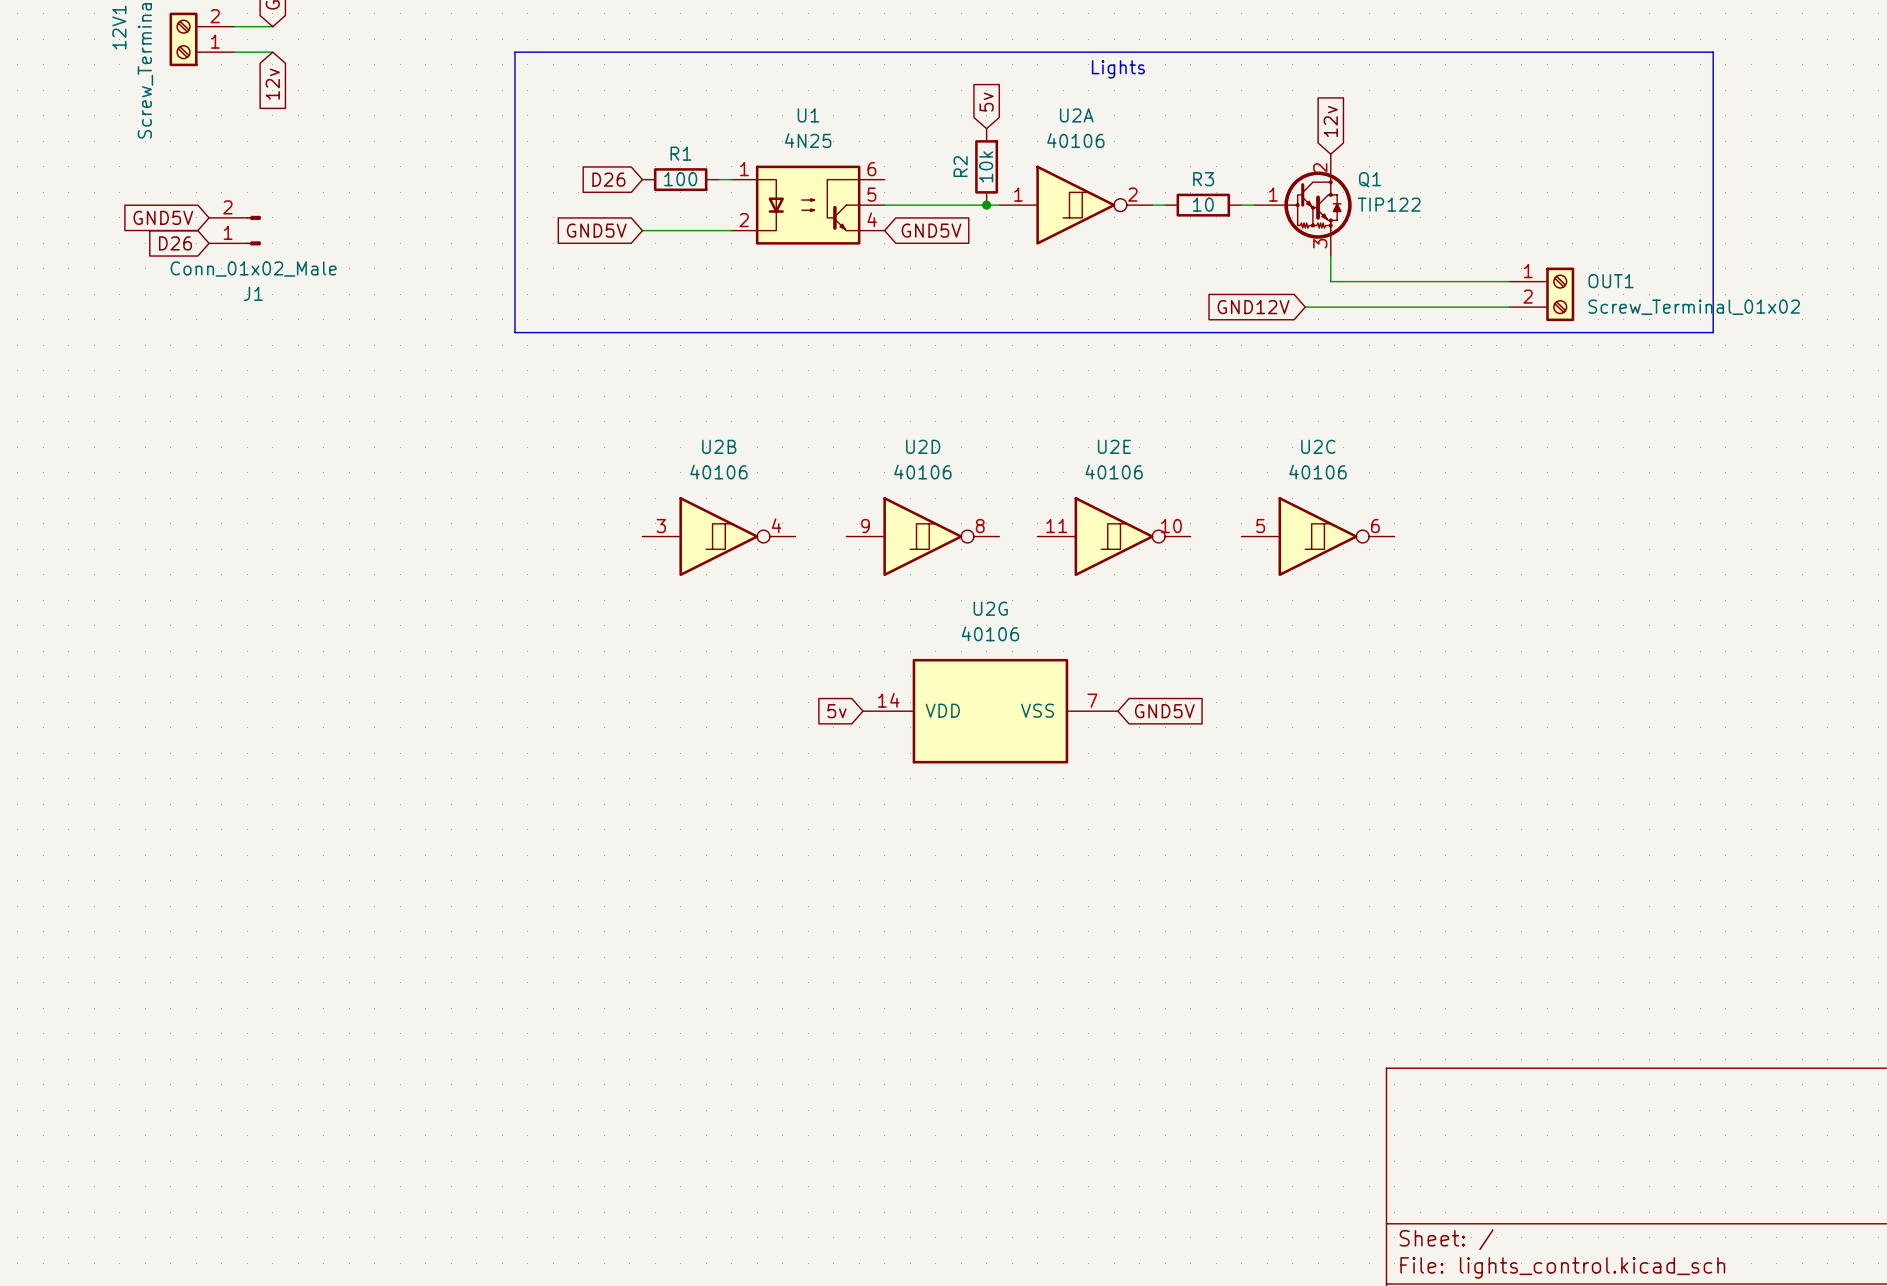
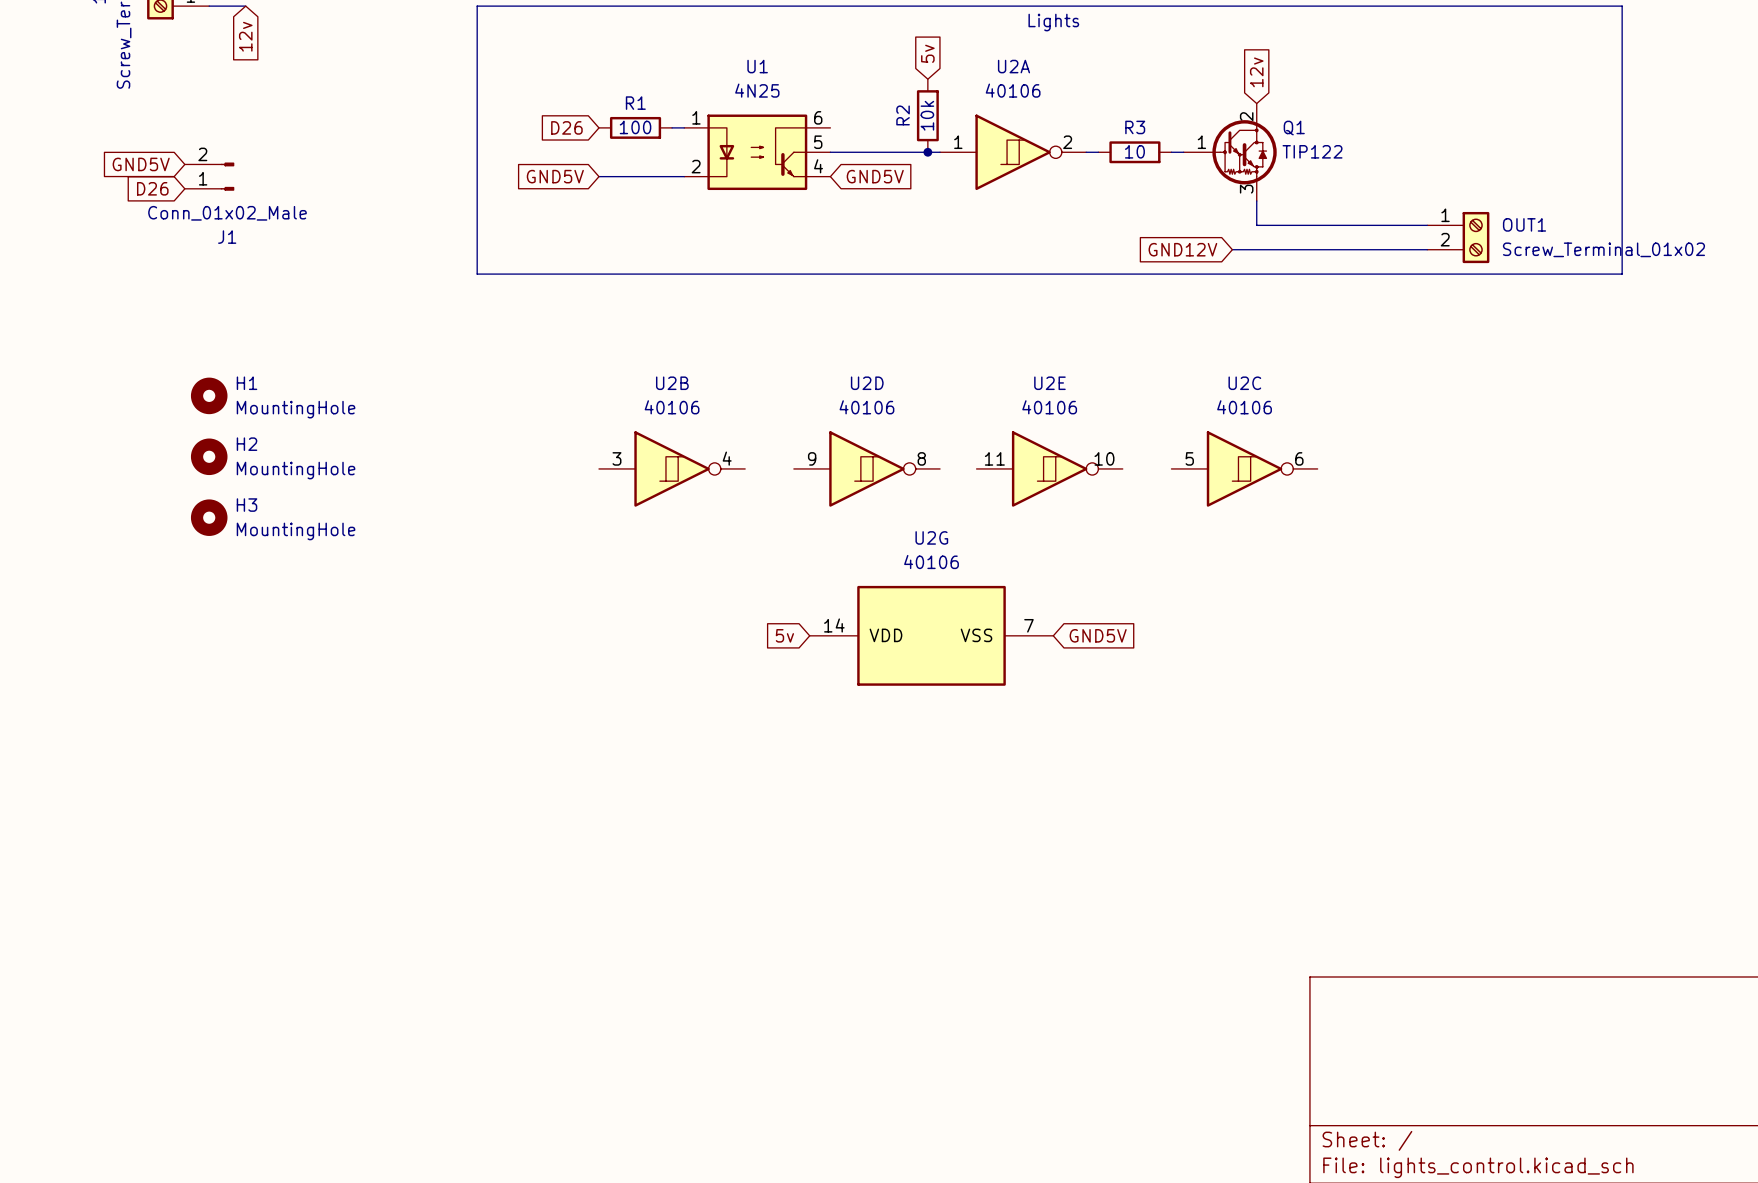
H1: none -> MountingHole (209, 395)
H2: none -> MountingHole (209, 456)
H3: none -> MountingHole (209, 517)

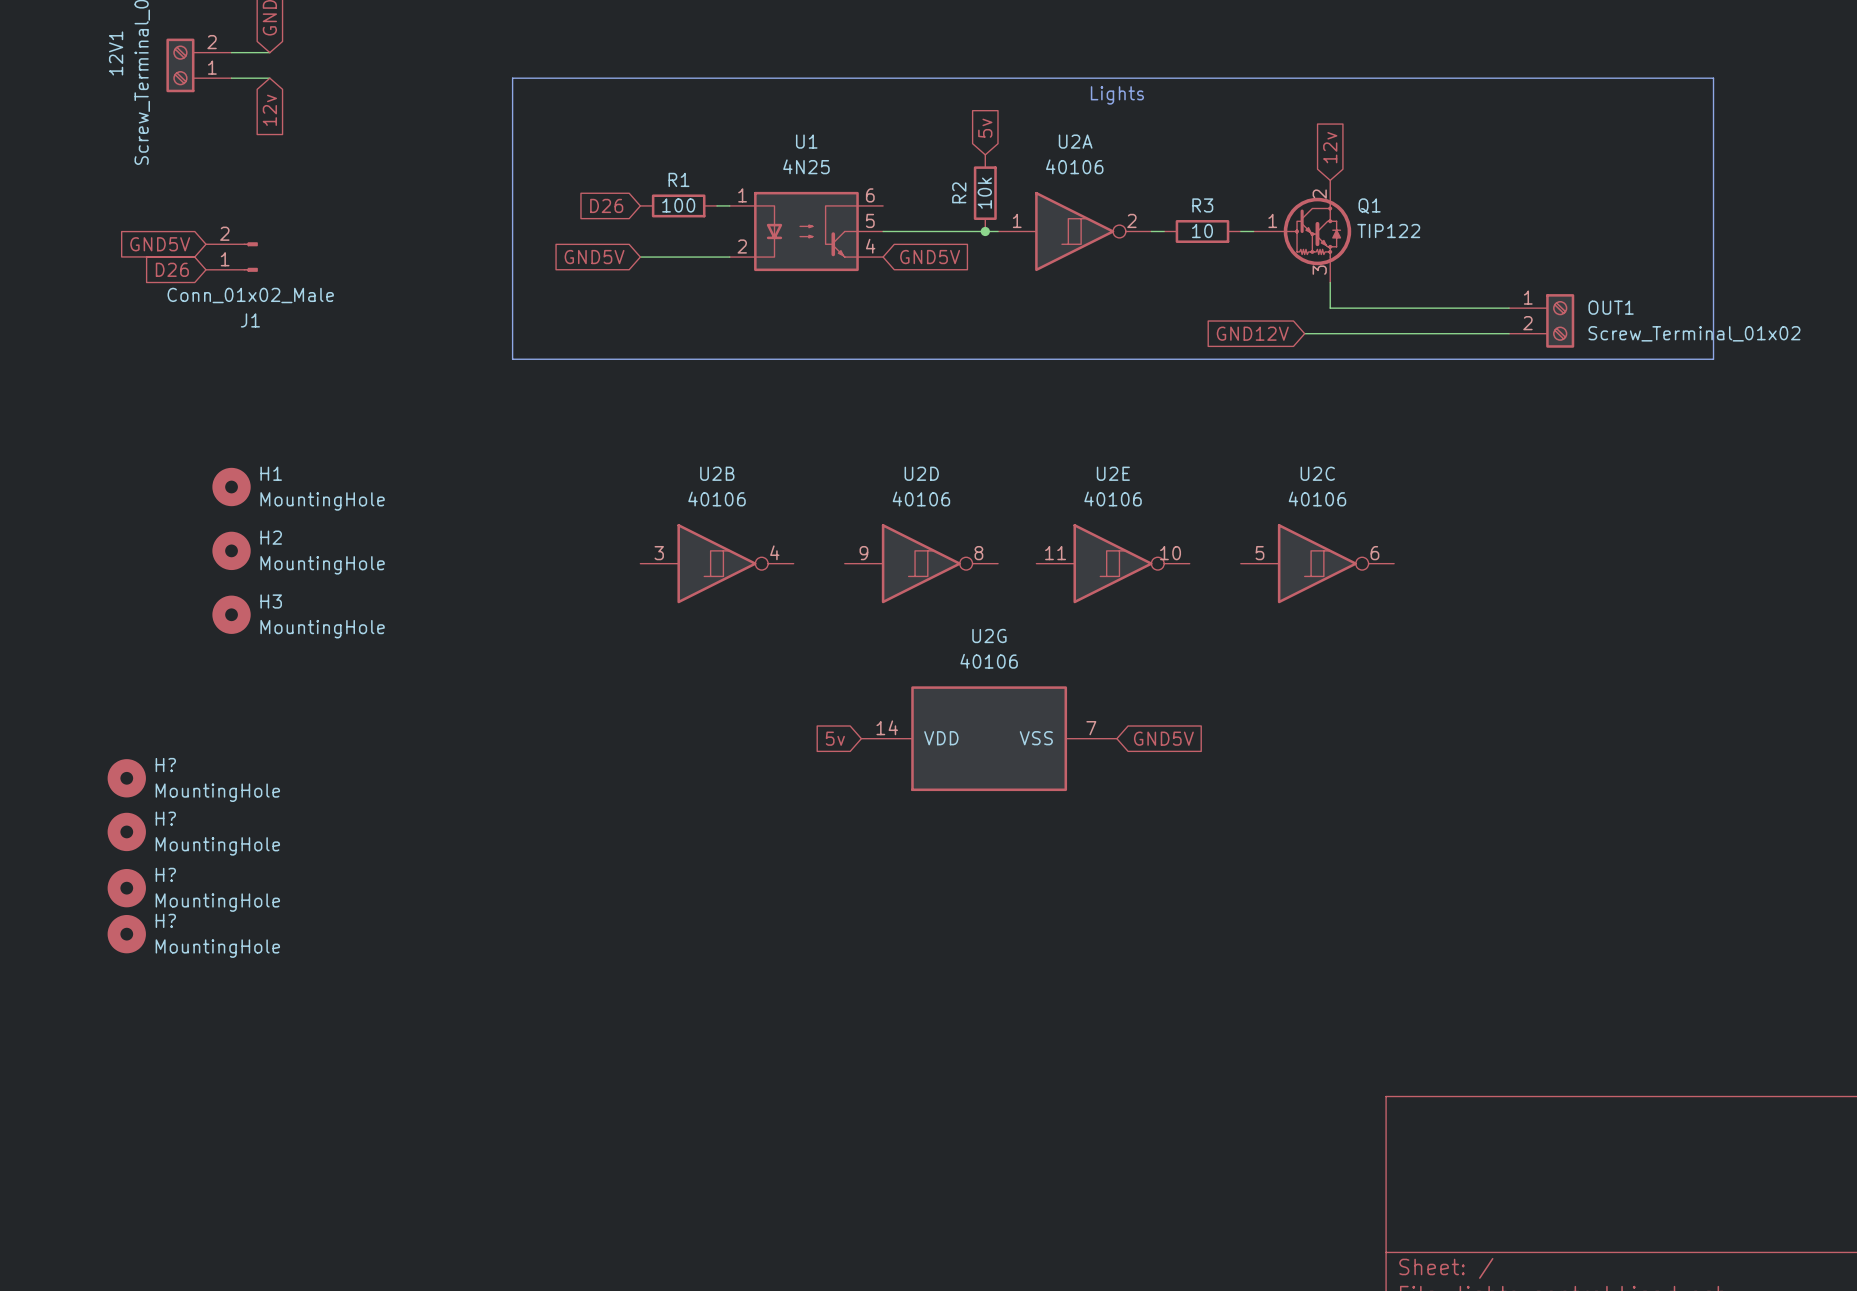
H?: none -> MountingHole (126, 778)
H?: none -> MountingHole (126, 831)
H?: none -> MountingHole (126, 888)
H?: none -> MountingHole (126, 934)

